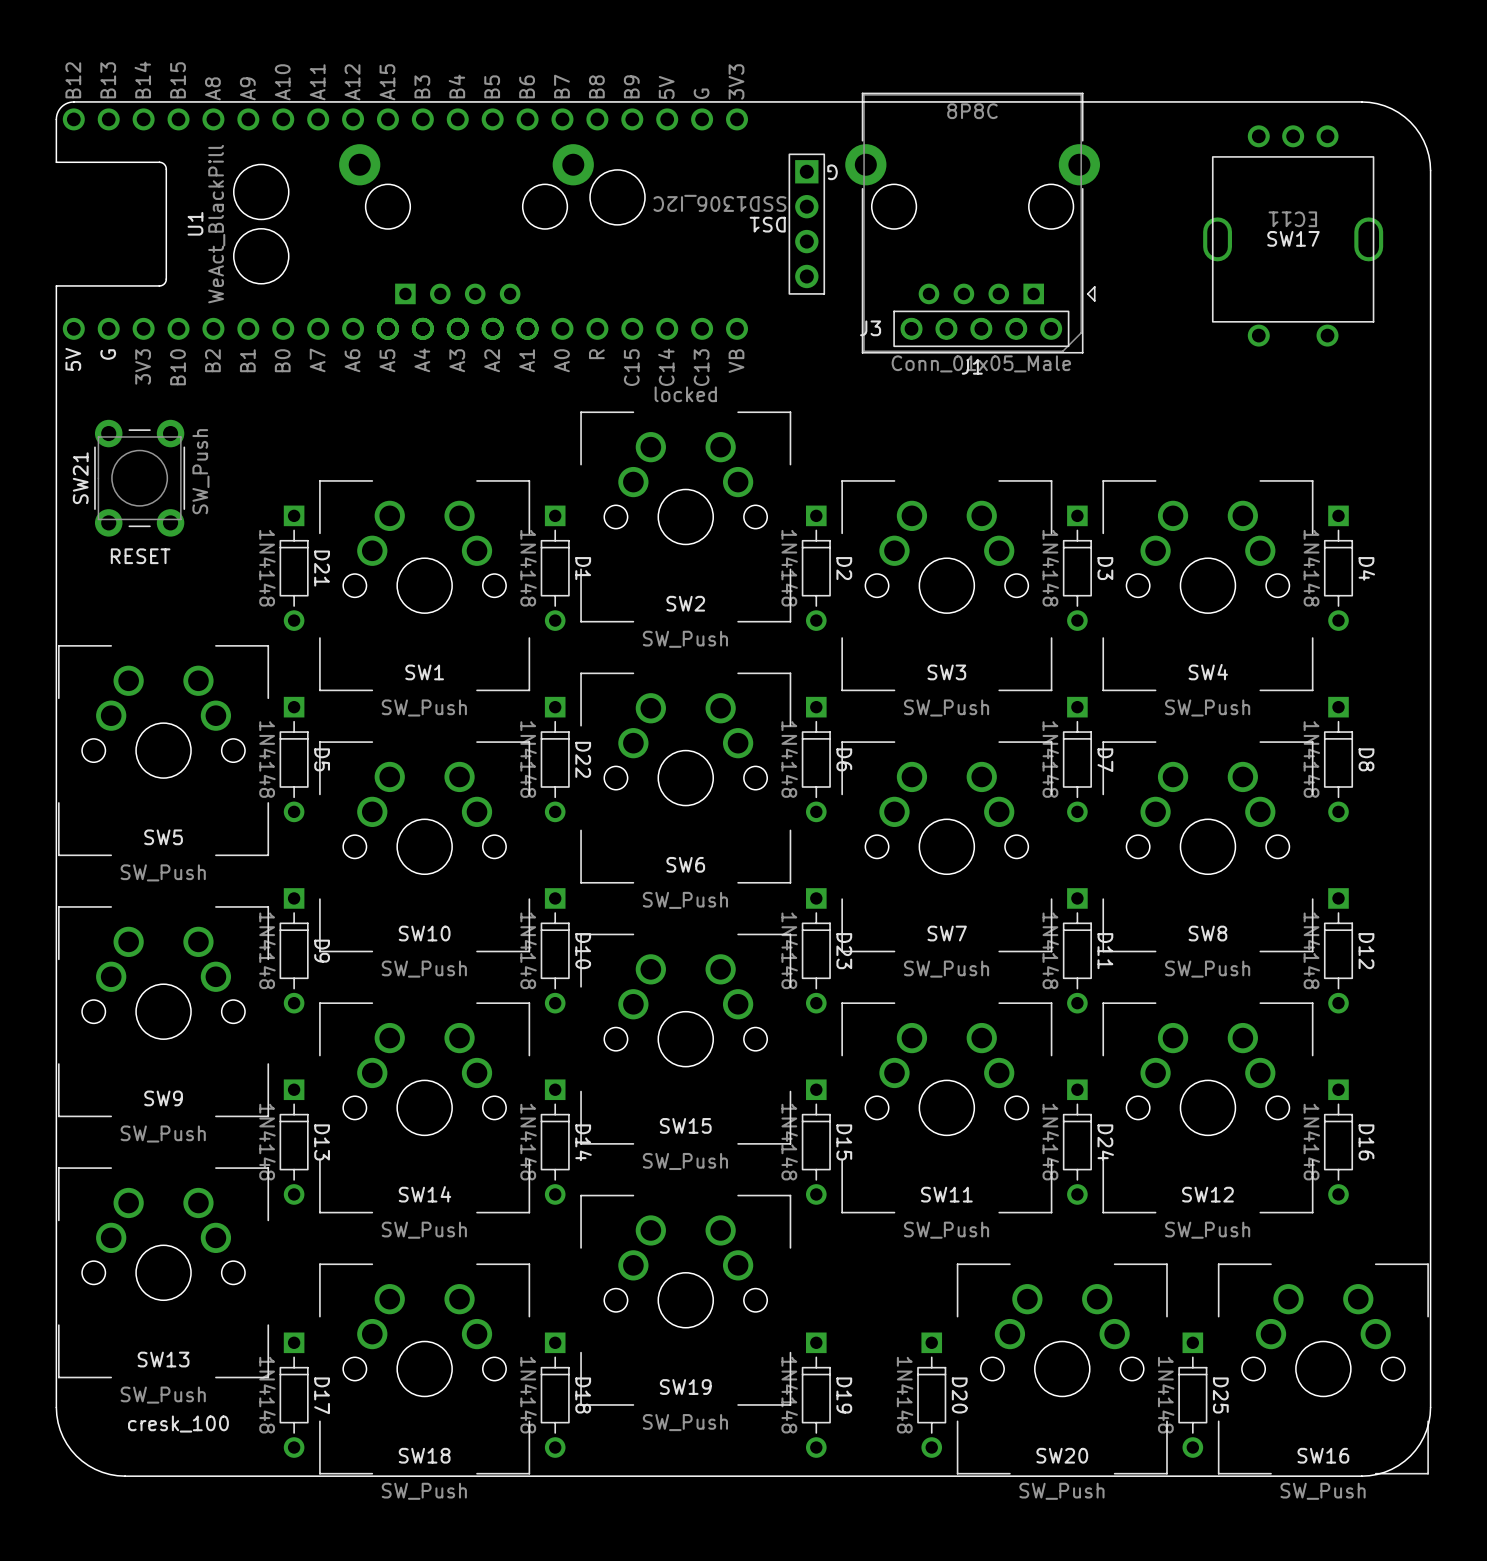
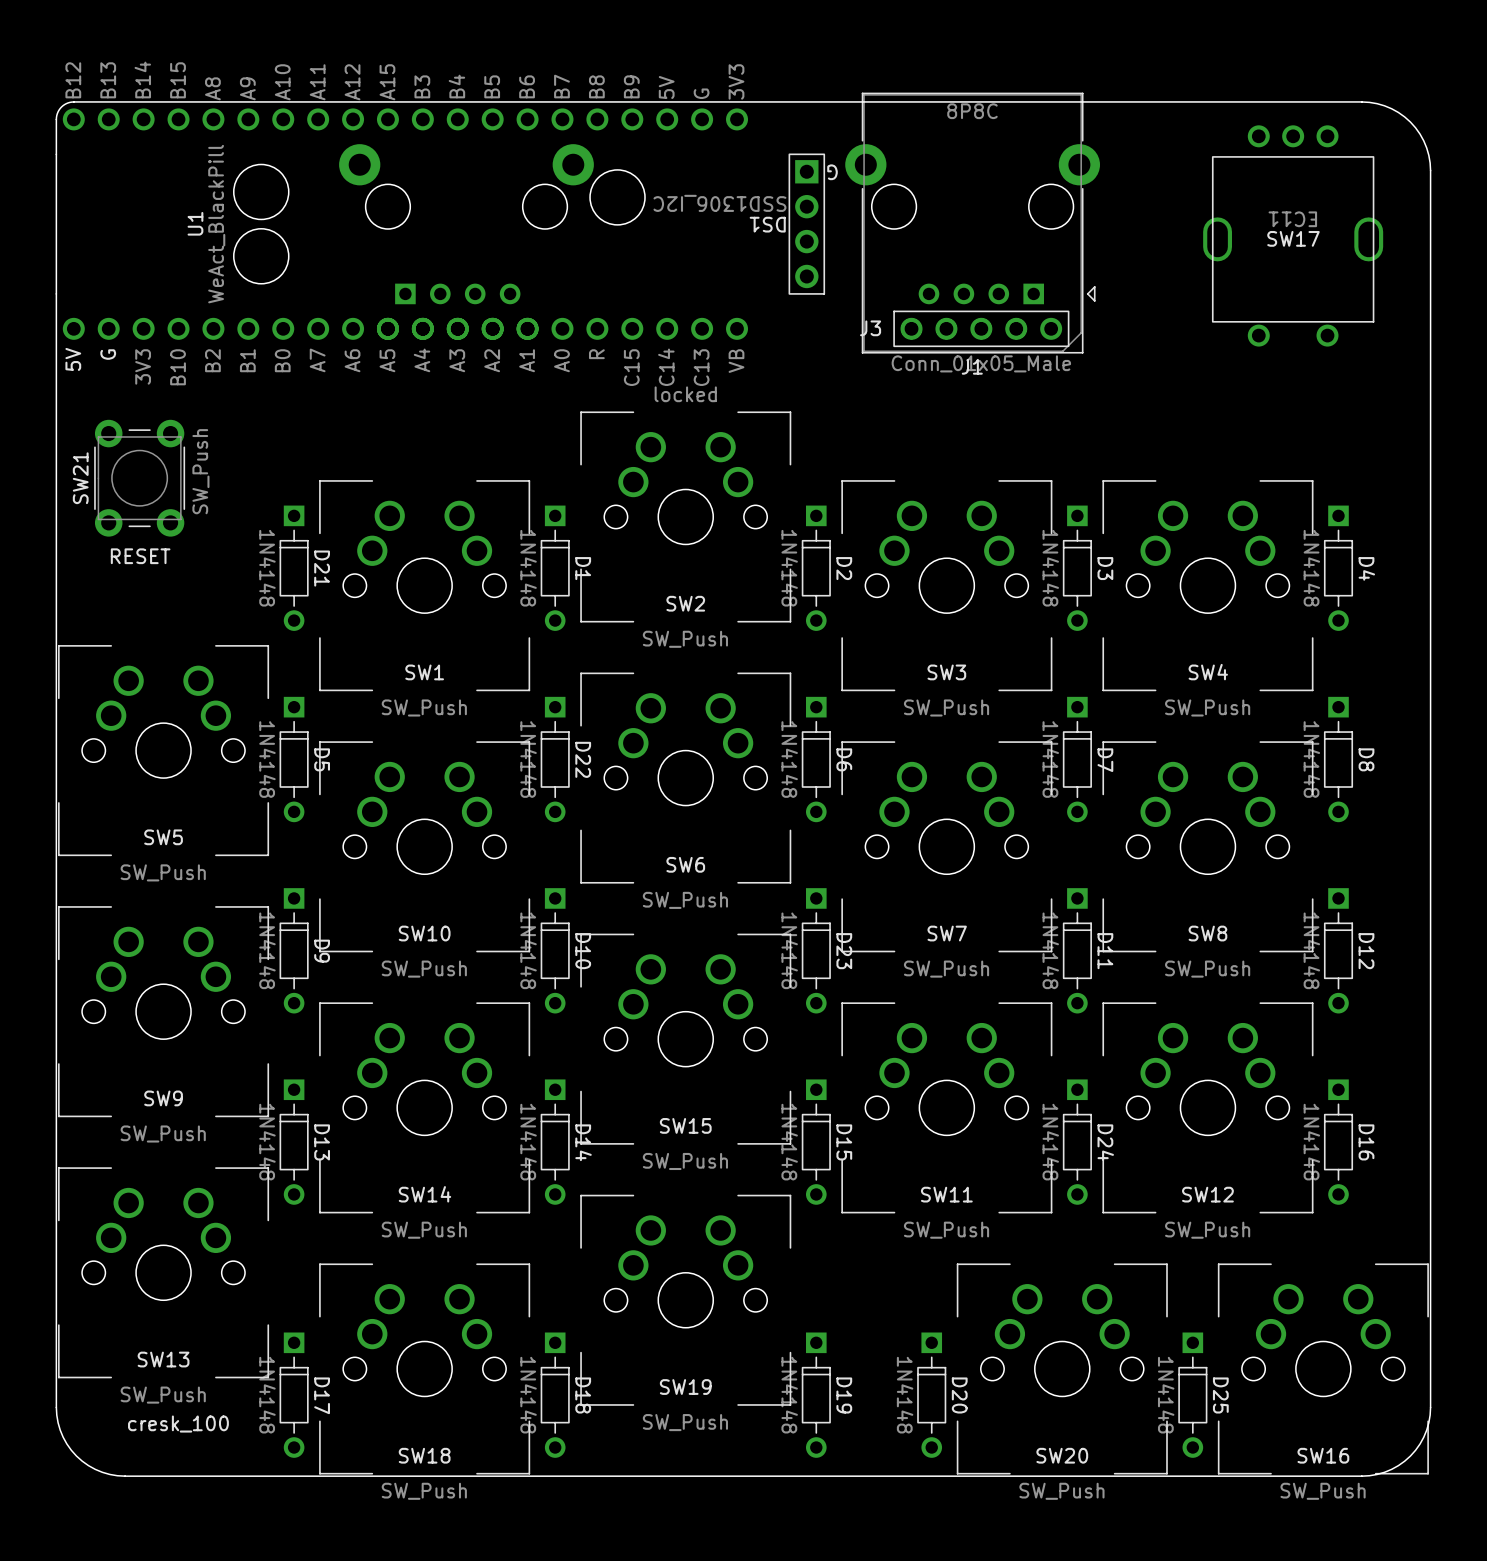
board edge: (56, 162) (159, 162) (164, 164) (166, 169) (166, 279) (164, 283) (159, 285) (56, 285) -> (56, 162) (56, 285)

